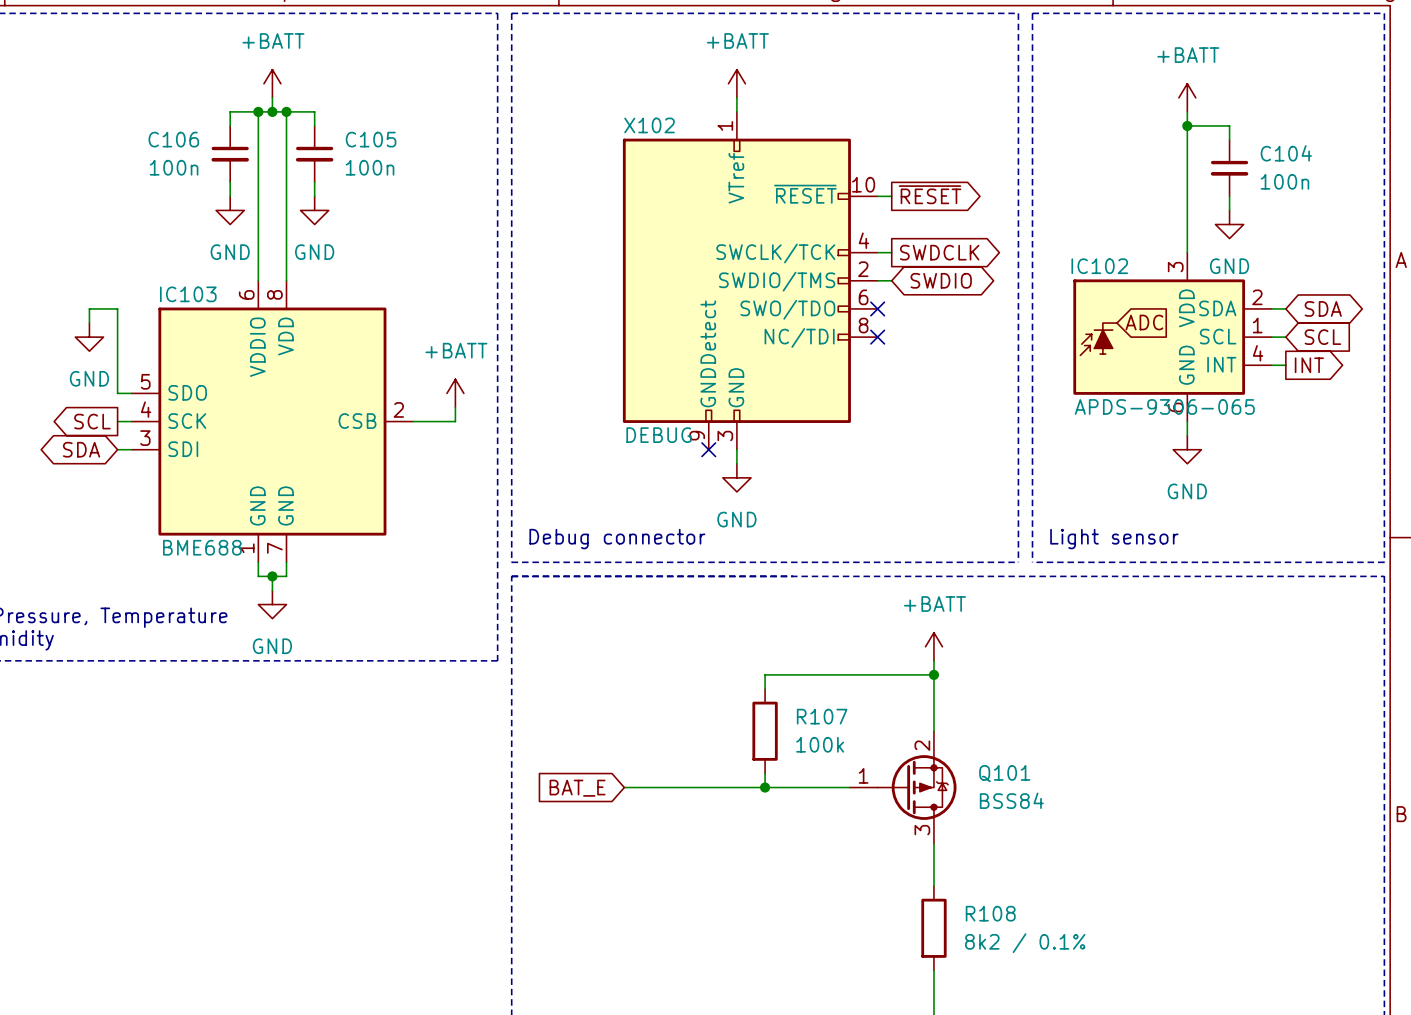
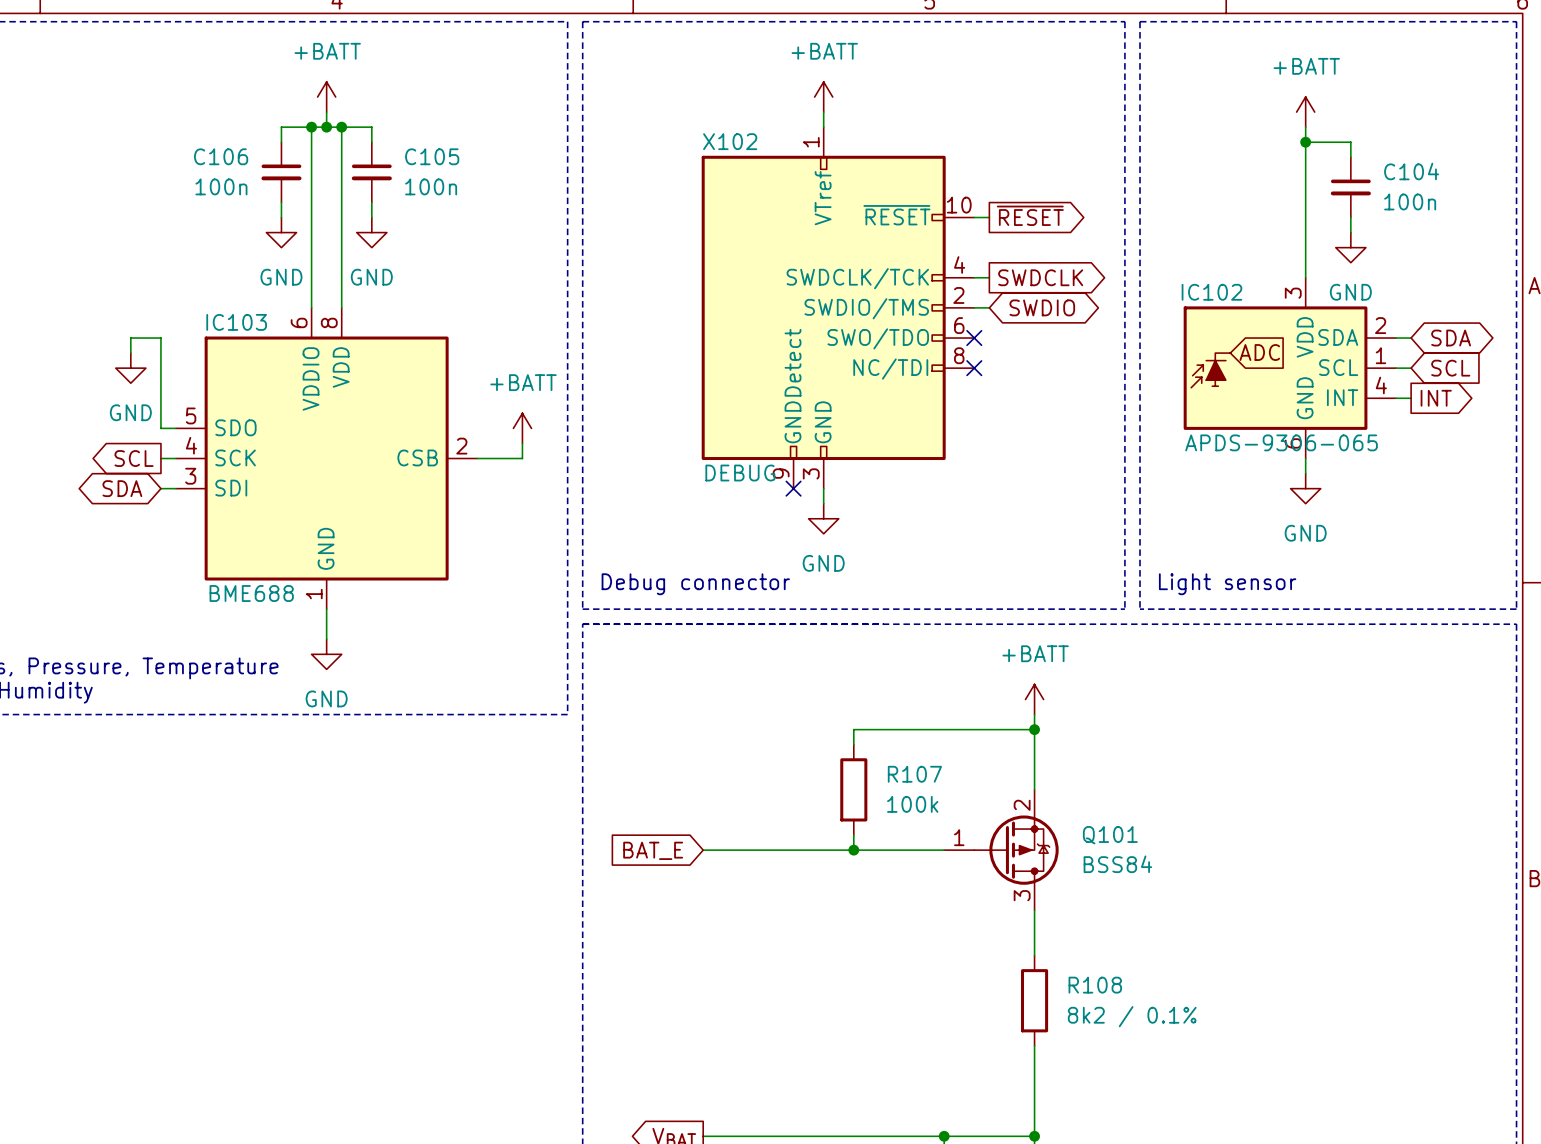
X102 pin name: SWCLK/TCK (775, 253) -> SWDCLK/TCK (857, 278)
IC103 symbol: [131, 280, 414, 563] -> [176, 307, 478, 610]
wire: (258, 562) (258, 576) (286, 576) (286, 562) -> none
wire: none -> (326, 609) (326, 624)
junction: (272, 576) -> none

